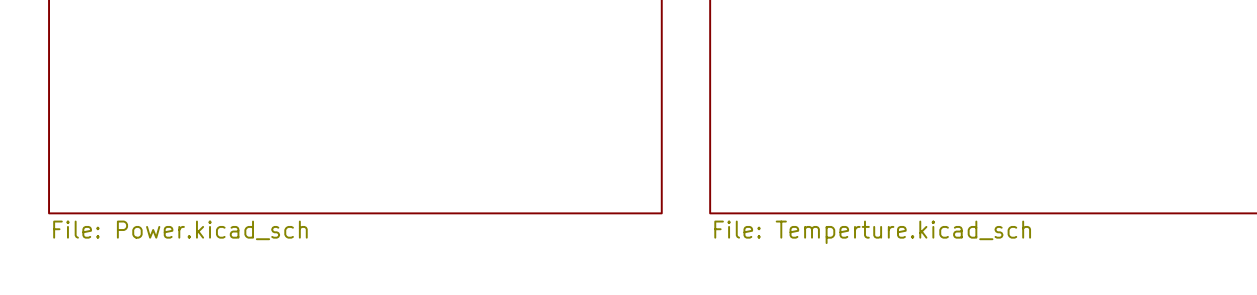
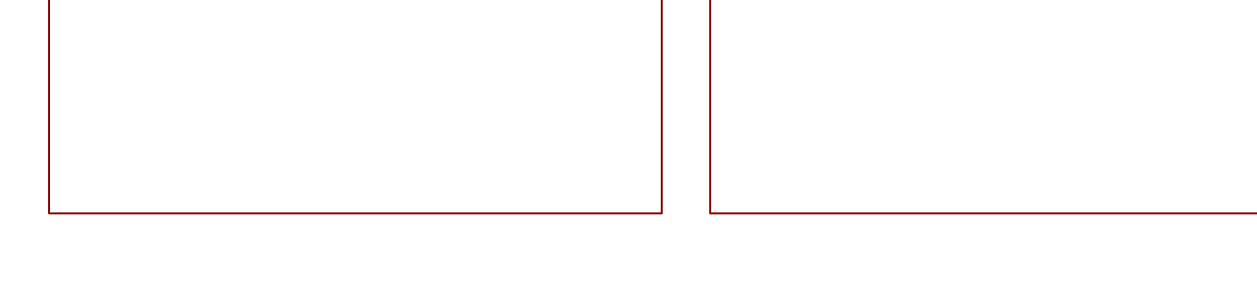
sheet value: File: Power.kicad_sch (180, 230) -> none
sheet value: File: Temperture.kicad_sch (872, 232) -> none

